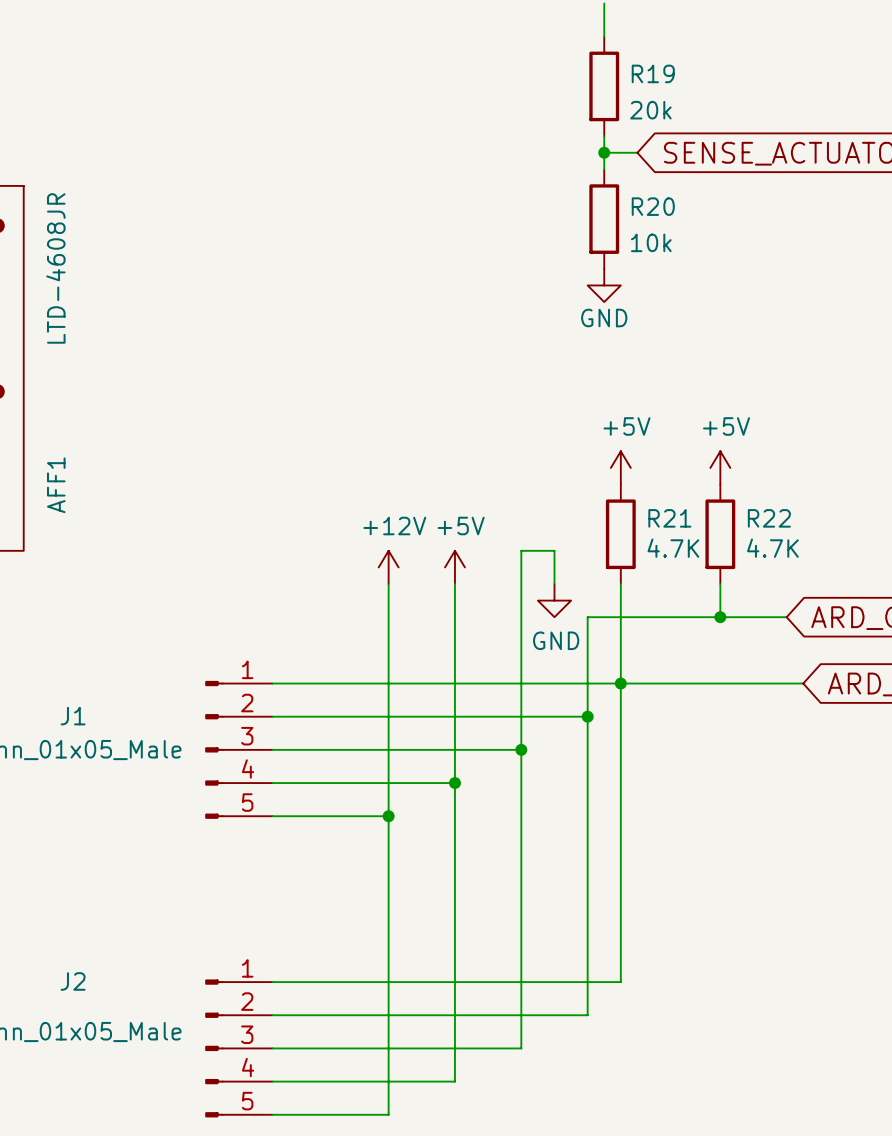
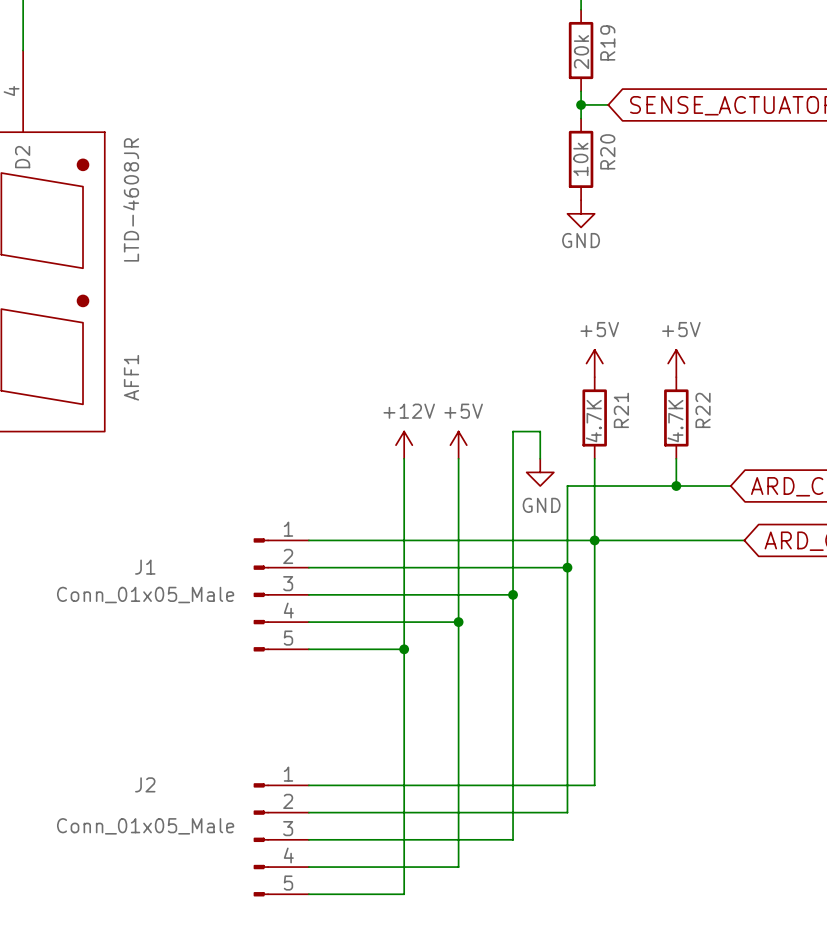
R19 name rotation: 0° (653, 73) -> 90° counterclockwise (607, 42)
R19 value rotation: 0° (650, 110) -> 90° counterclockwise (581, 52)
R19 value position: 20k (650, 110) -> 20k (581, 52)
R20 name rotation: 0° (653, 206) -> 90° counterclockwise (607, 151)
R20 value rotation: 0° (651, 242) -> 90° counterclockwise (580, 159)
R20 value position: 10k (651, 242) -> 10k (580, 159)
R21 name rotation: 0° (669, 518) -> 90° counterclockwise (621, 410)
R22 name rotation: 0° (769, 518) -> 90° counterclockwise (703, 410)
R21 value rotation: 0° (673, 548) -> 90° counterclockwise (593, 421)
R22 value rotation: 0° (772, 548) -> 90° counterclockwise (675, 421)

